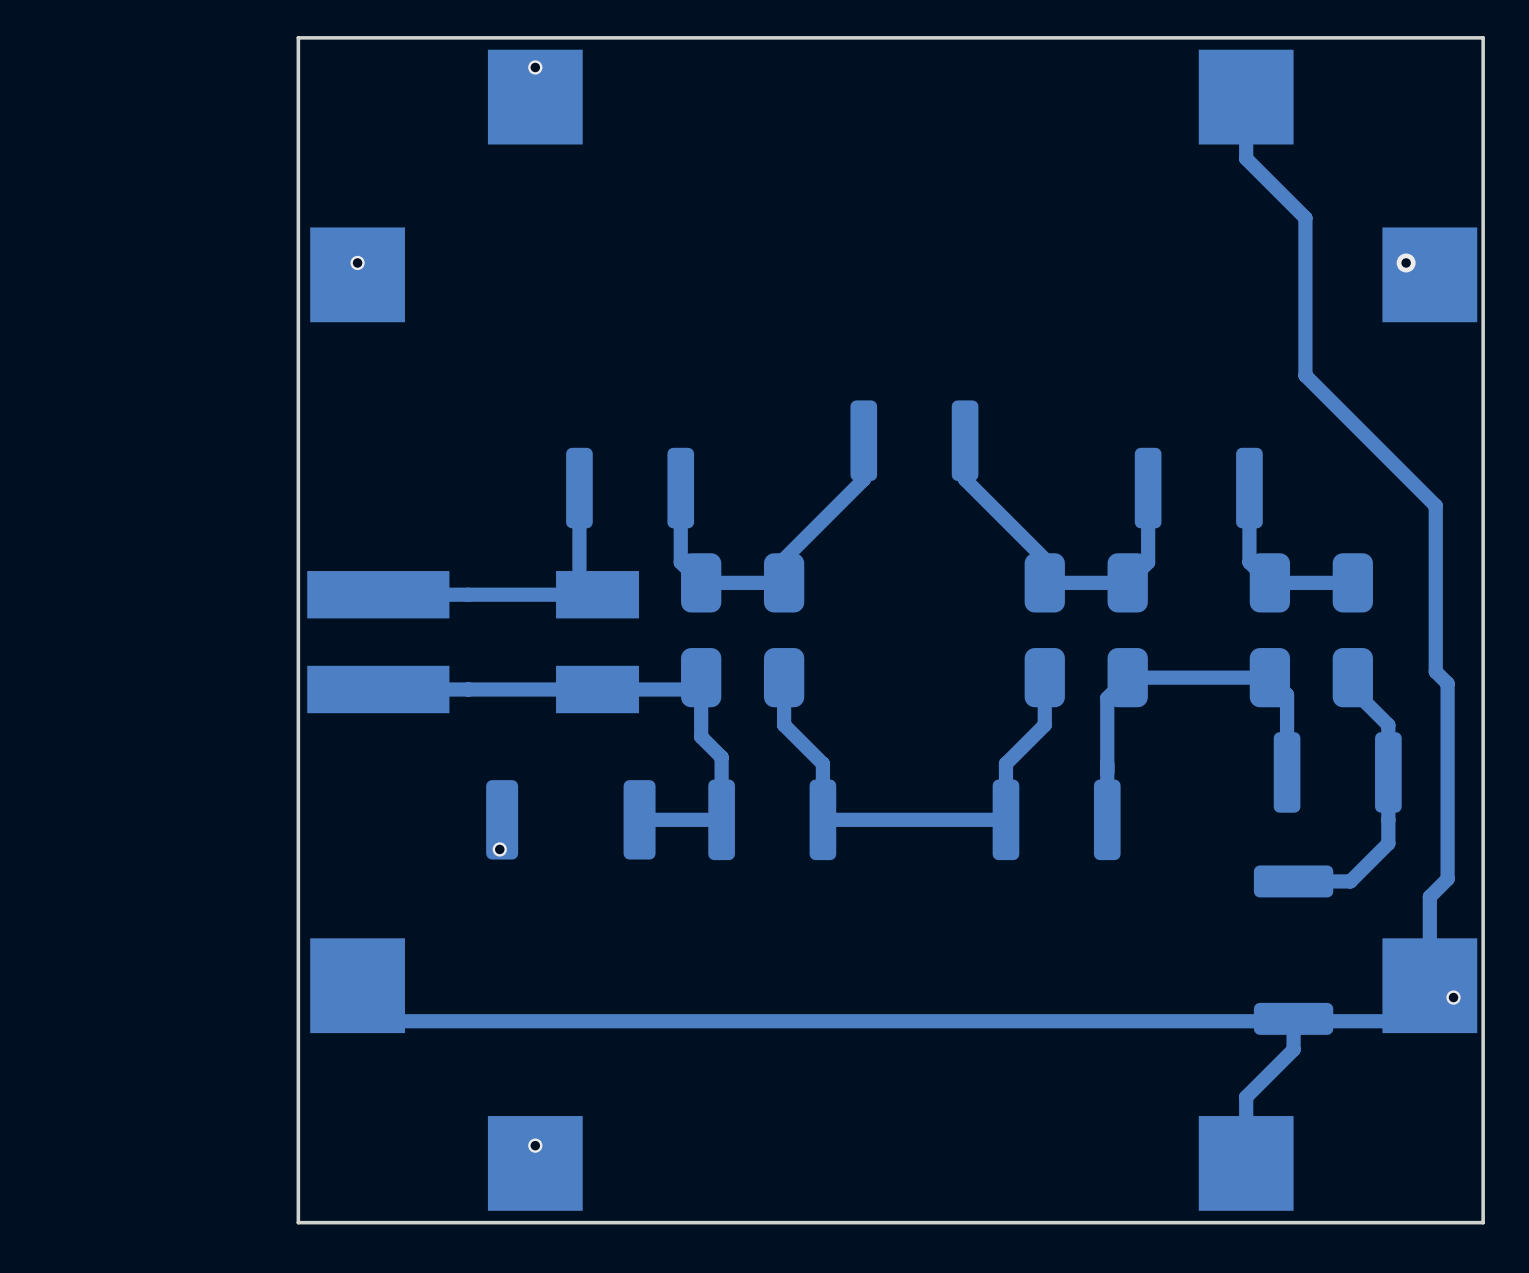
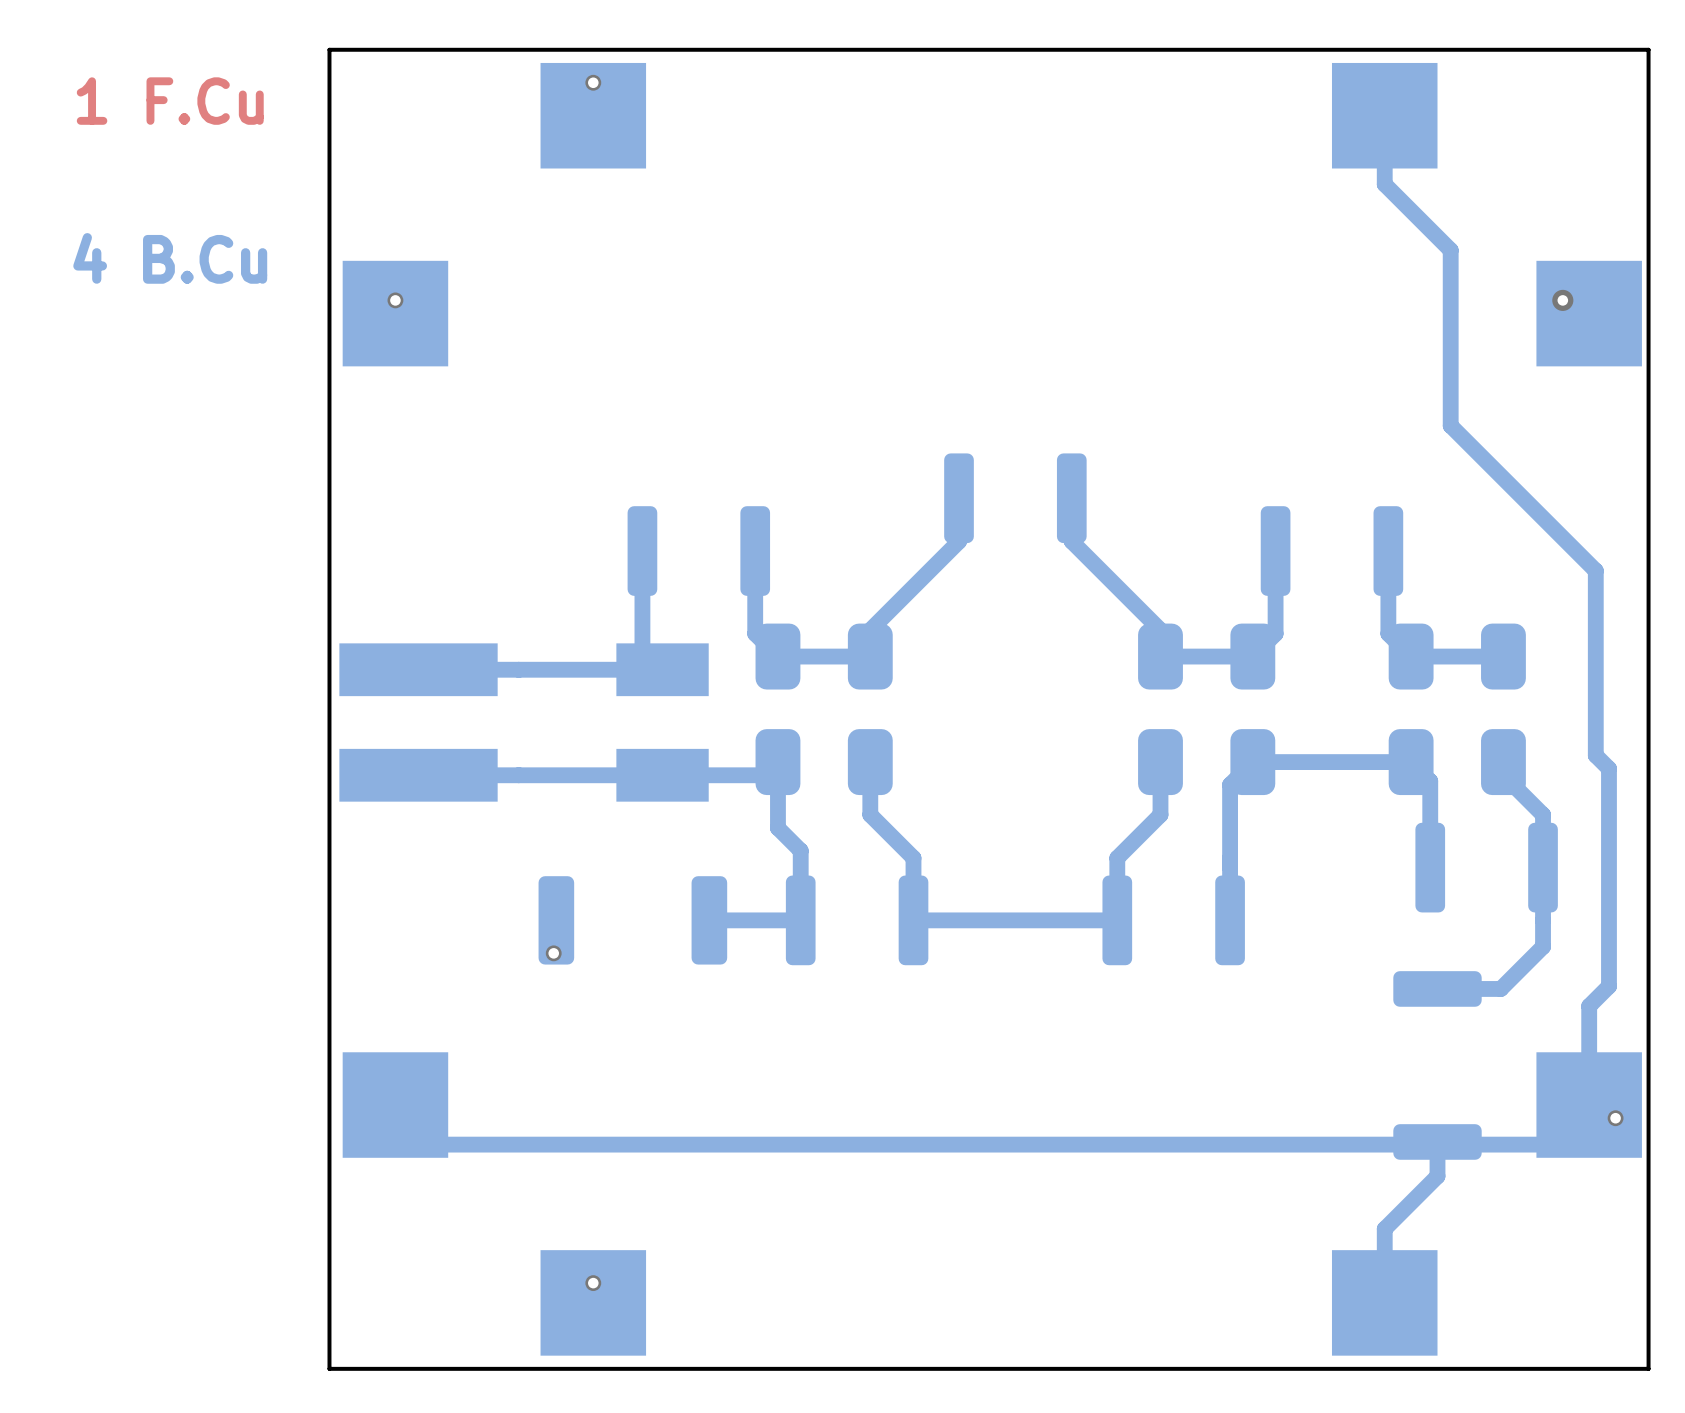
text: none -> 1 F.Cu (170, 101)
text: none -> 4 B.Cu (170, 258)

